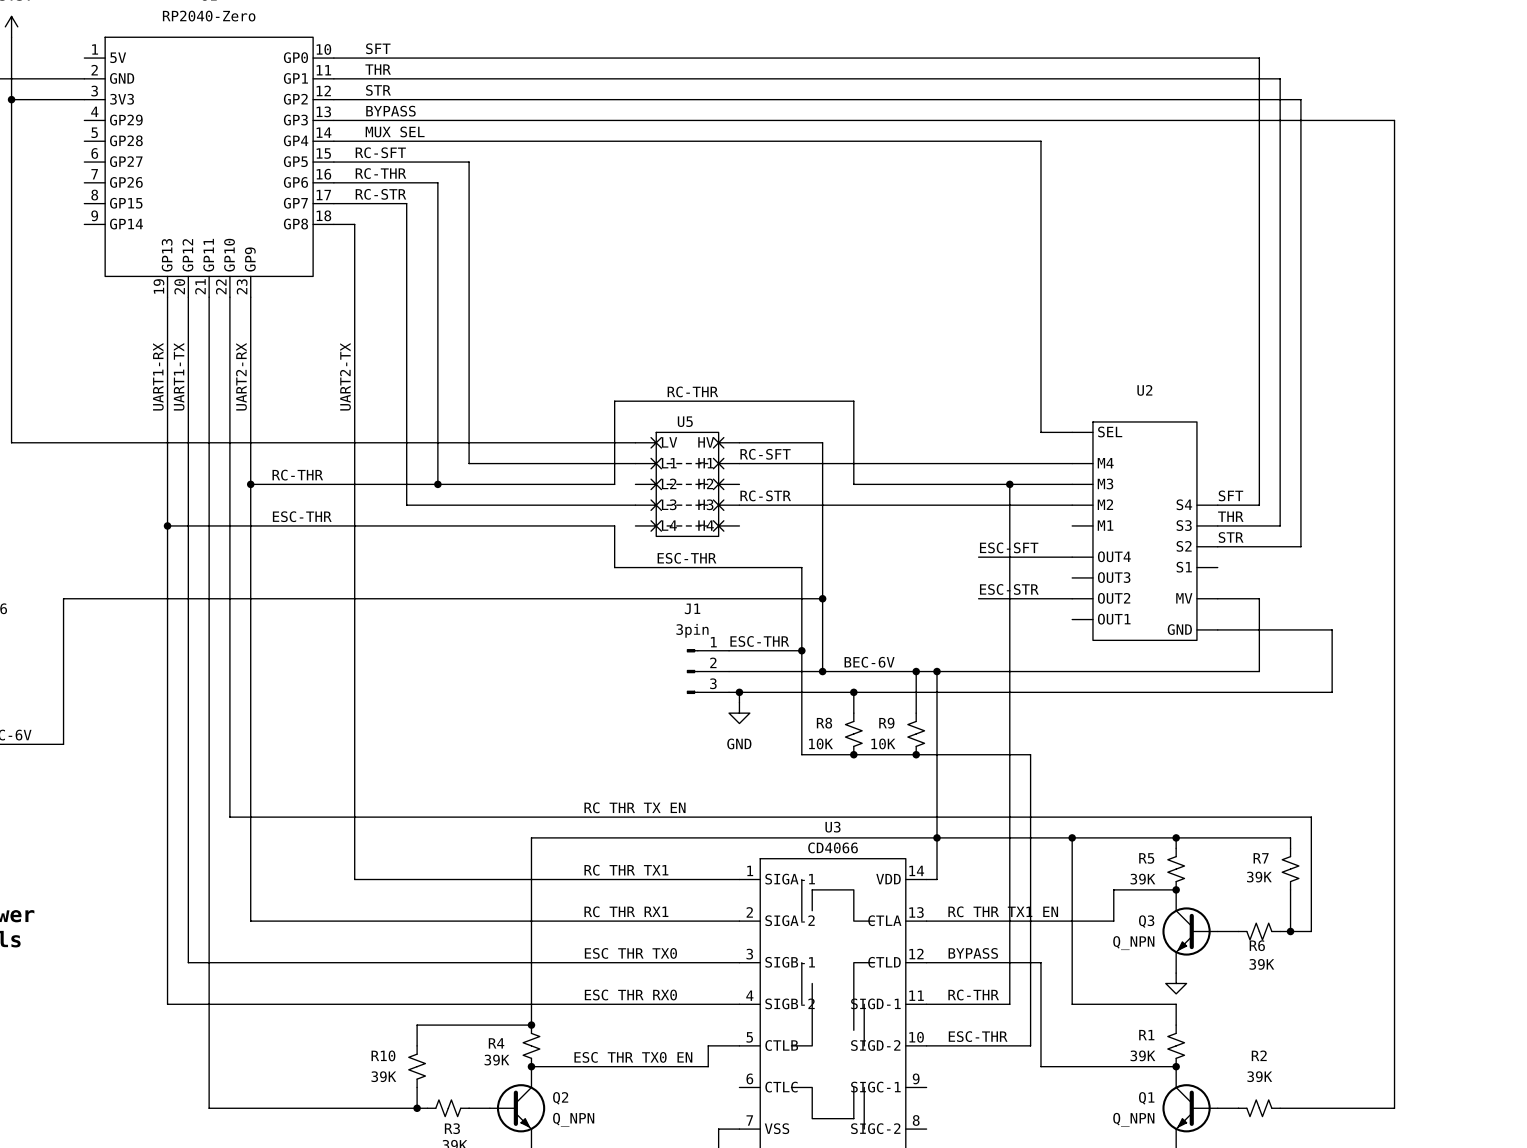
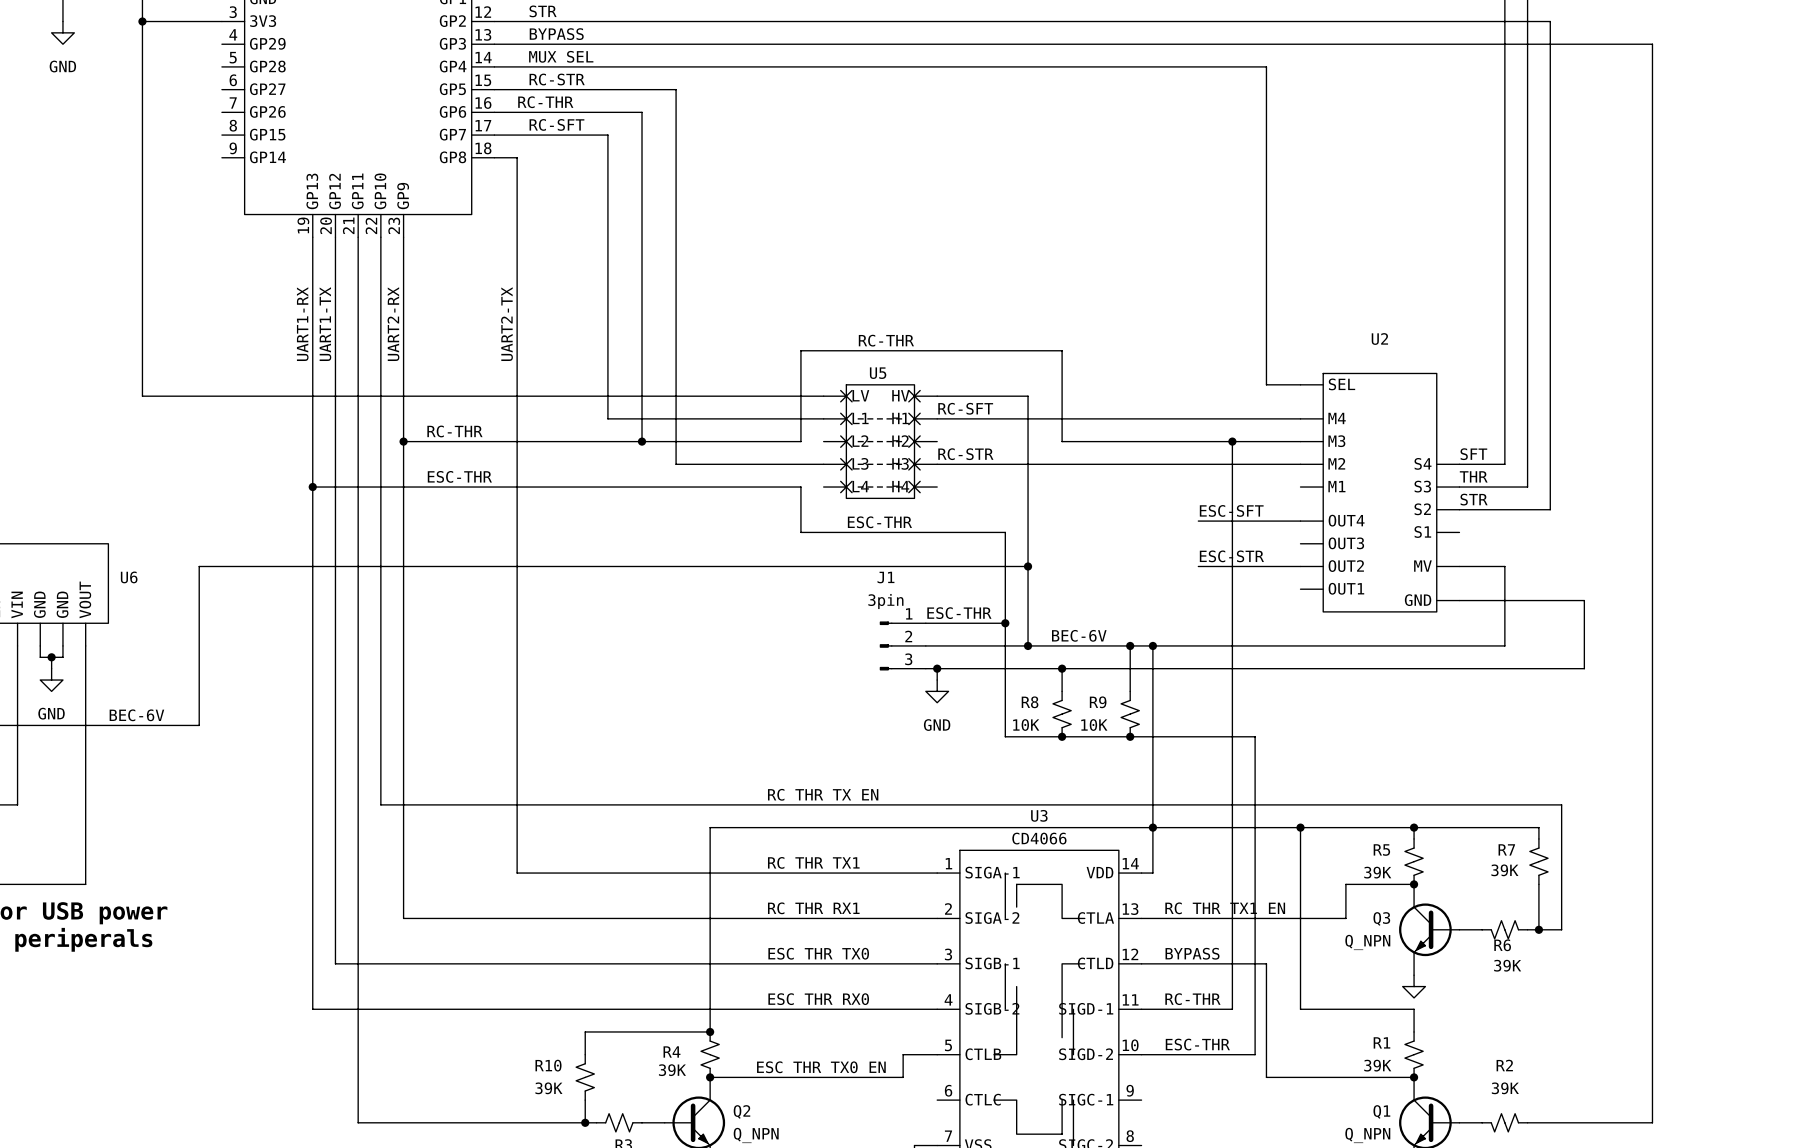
label position: RC-SFT (380, 152) -> RC-SFT (556, 124)
wire: (469, 162) (469, 182) -> (607, 112) (642, 112)
wire: (437, 182) (437, 203) -> (573, 135) (607, 135)
label position: RC-STR (380, 194) -> RC-STR (557, 79)
wire: (406, 203) (406, 505) (500, 505) -> (642, 89) (676, 89) (676, 464)
wire: (437, 463) (437, 484) -> (607, 418) (642, 418) (642, 441)
junction position: (437, 484) -> (642, 441)

